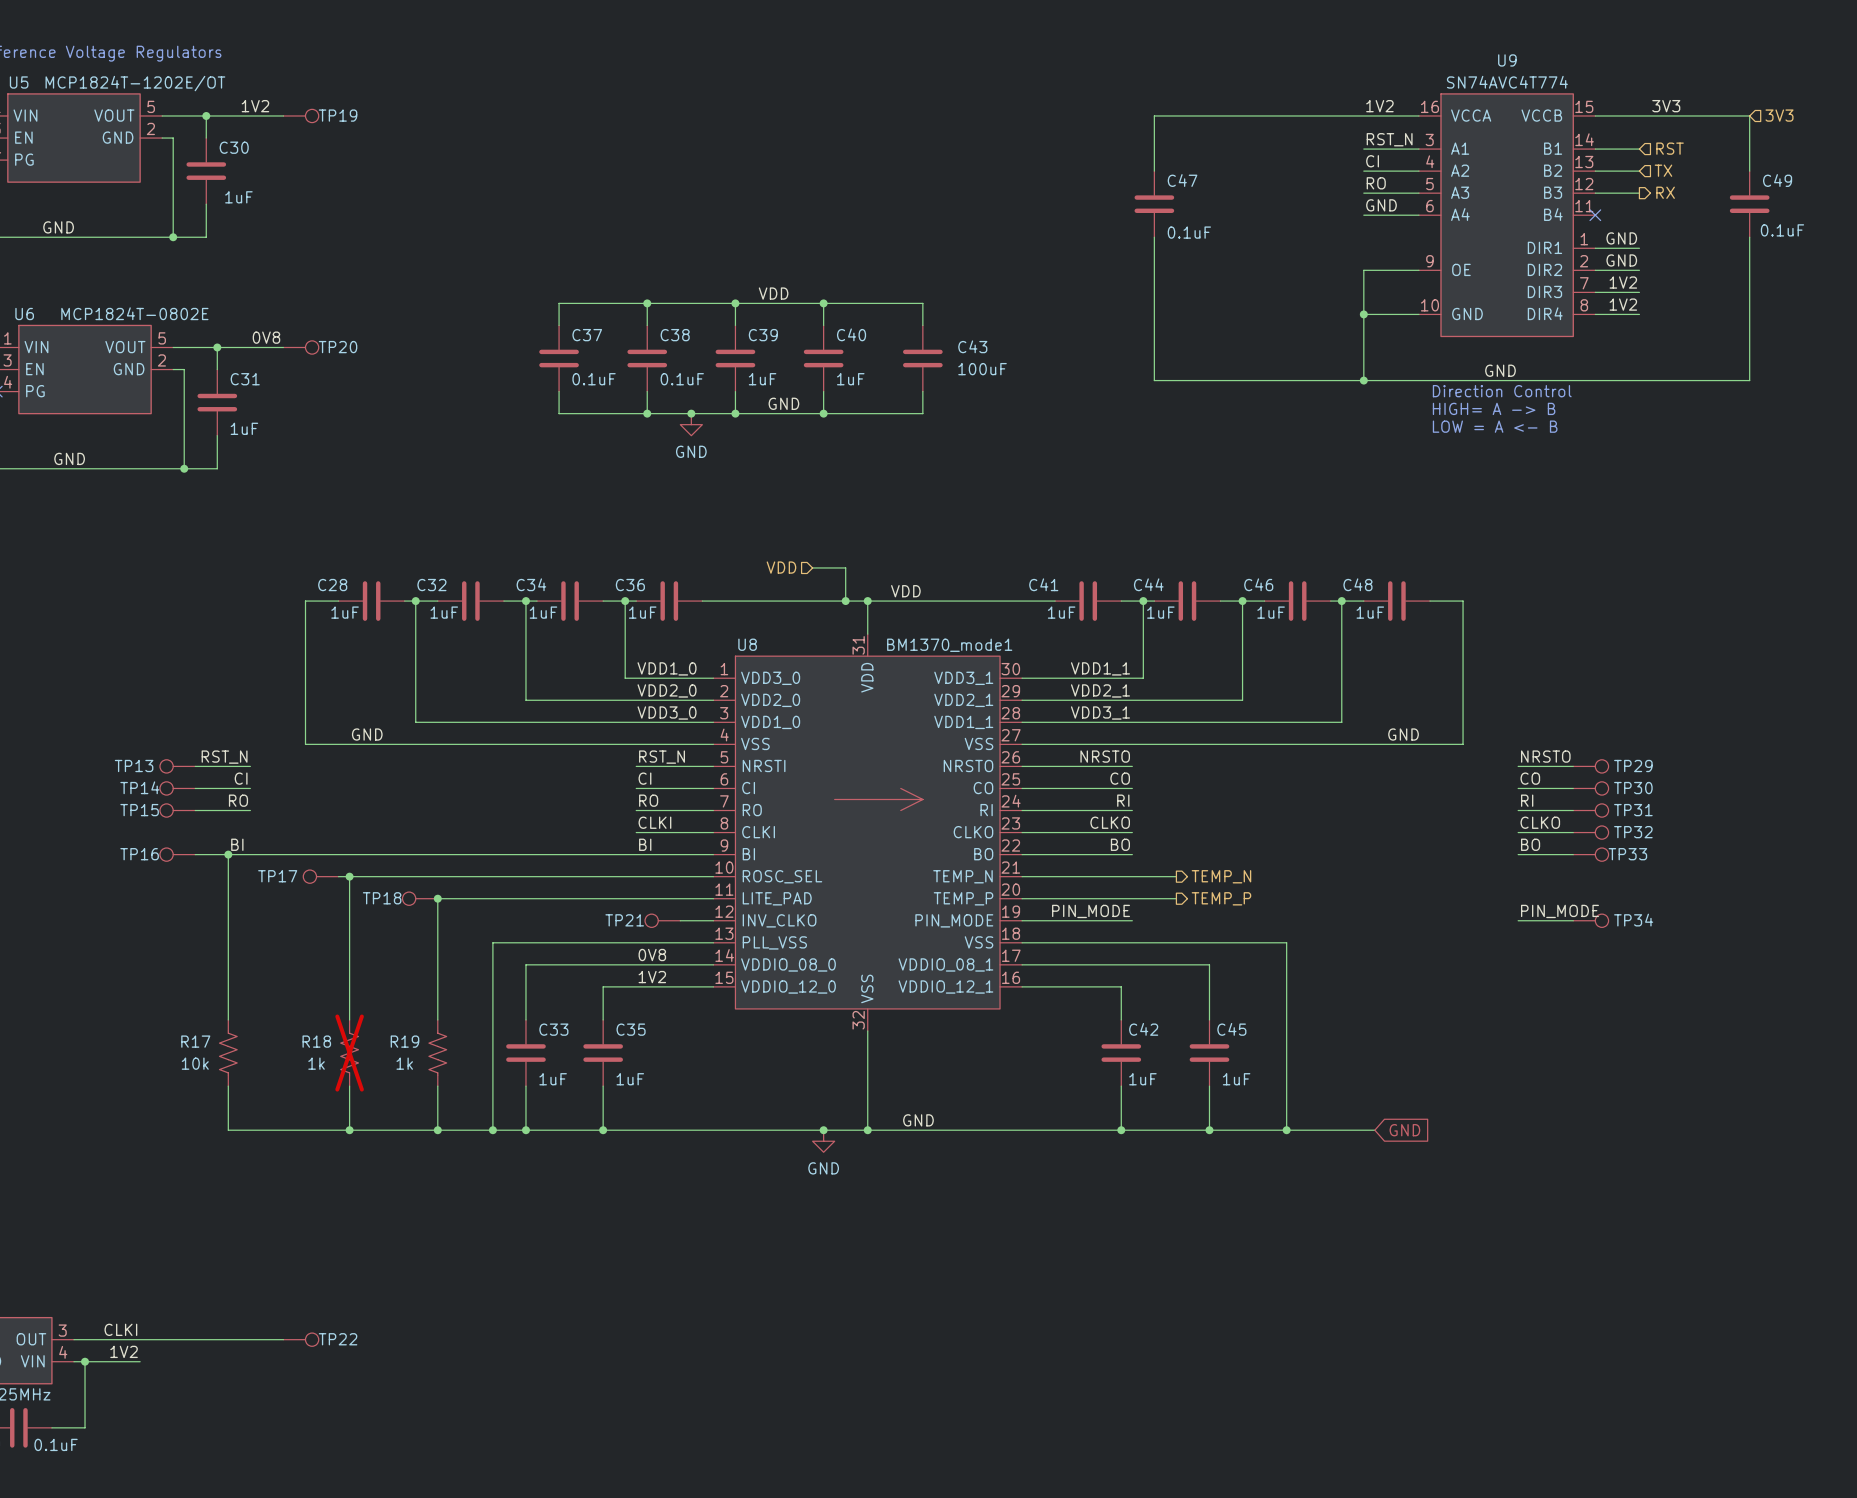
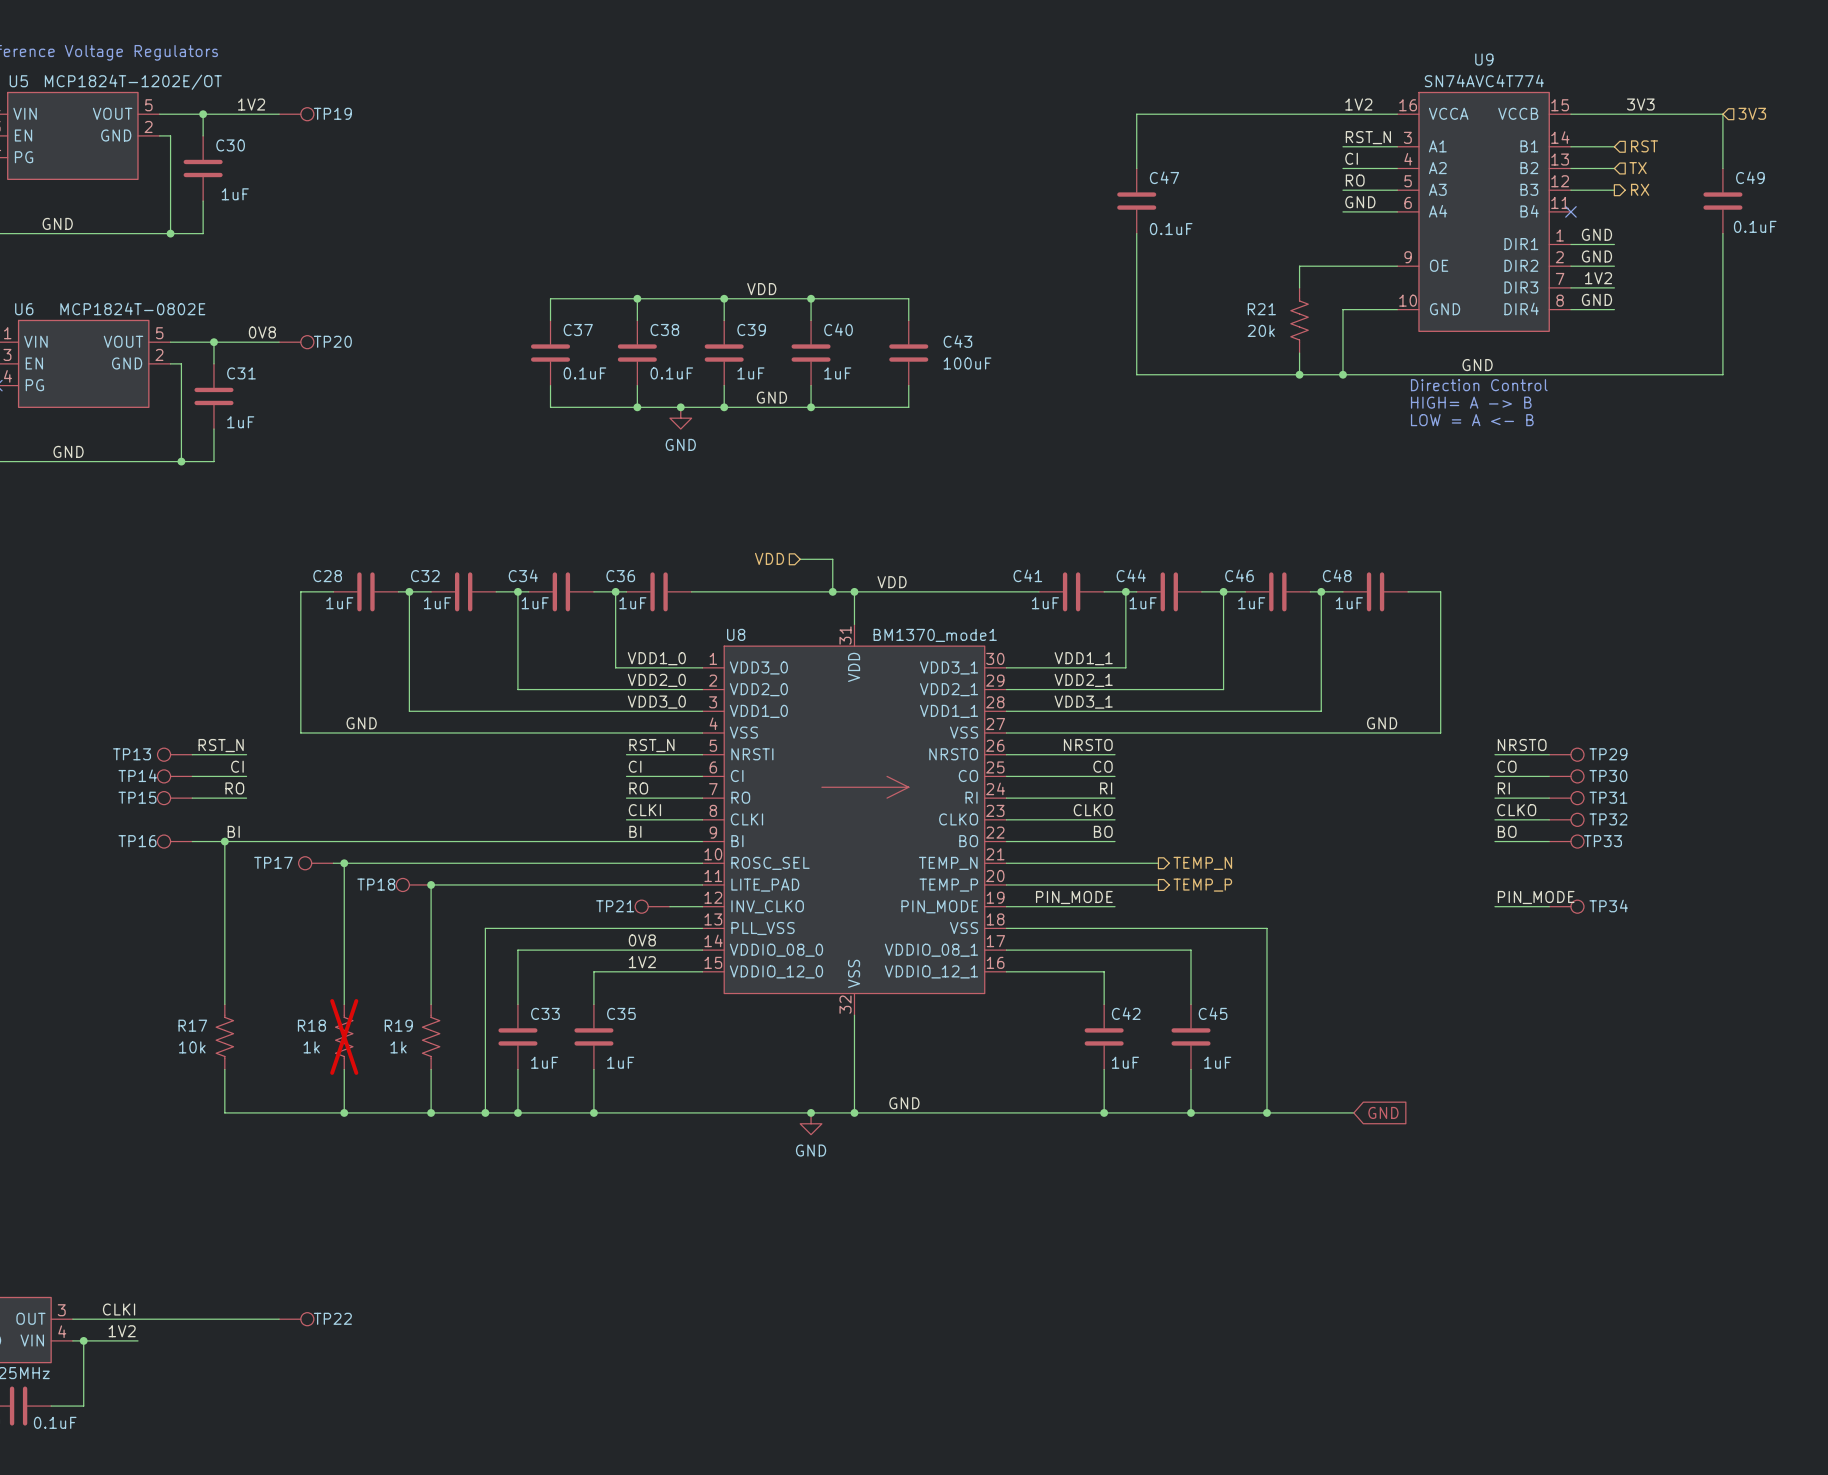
wire: (1363, 270) (1363, 314) -> (1342, 266) (1299, 266) (1299, 287)
label: 1V2 (1623, 304) -> GND (1596, 299)
junction: (1363, 314) -> none
R21: none -> 20k (1299, 320)
wire: none -> (1299, 353) (1299, 374)
junction: none -> (1299, 374)

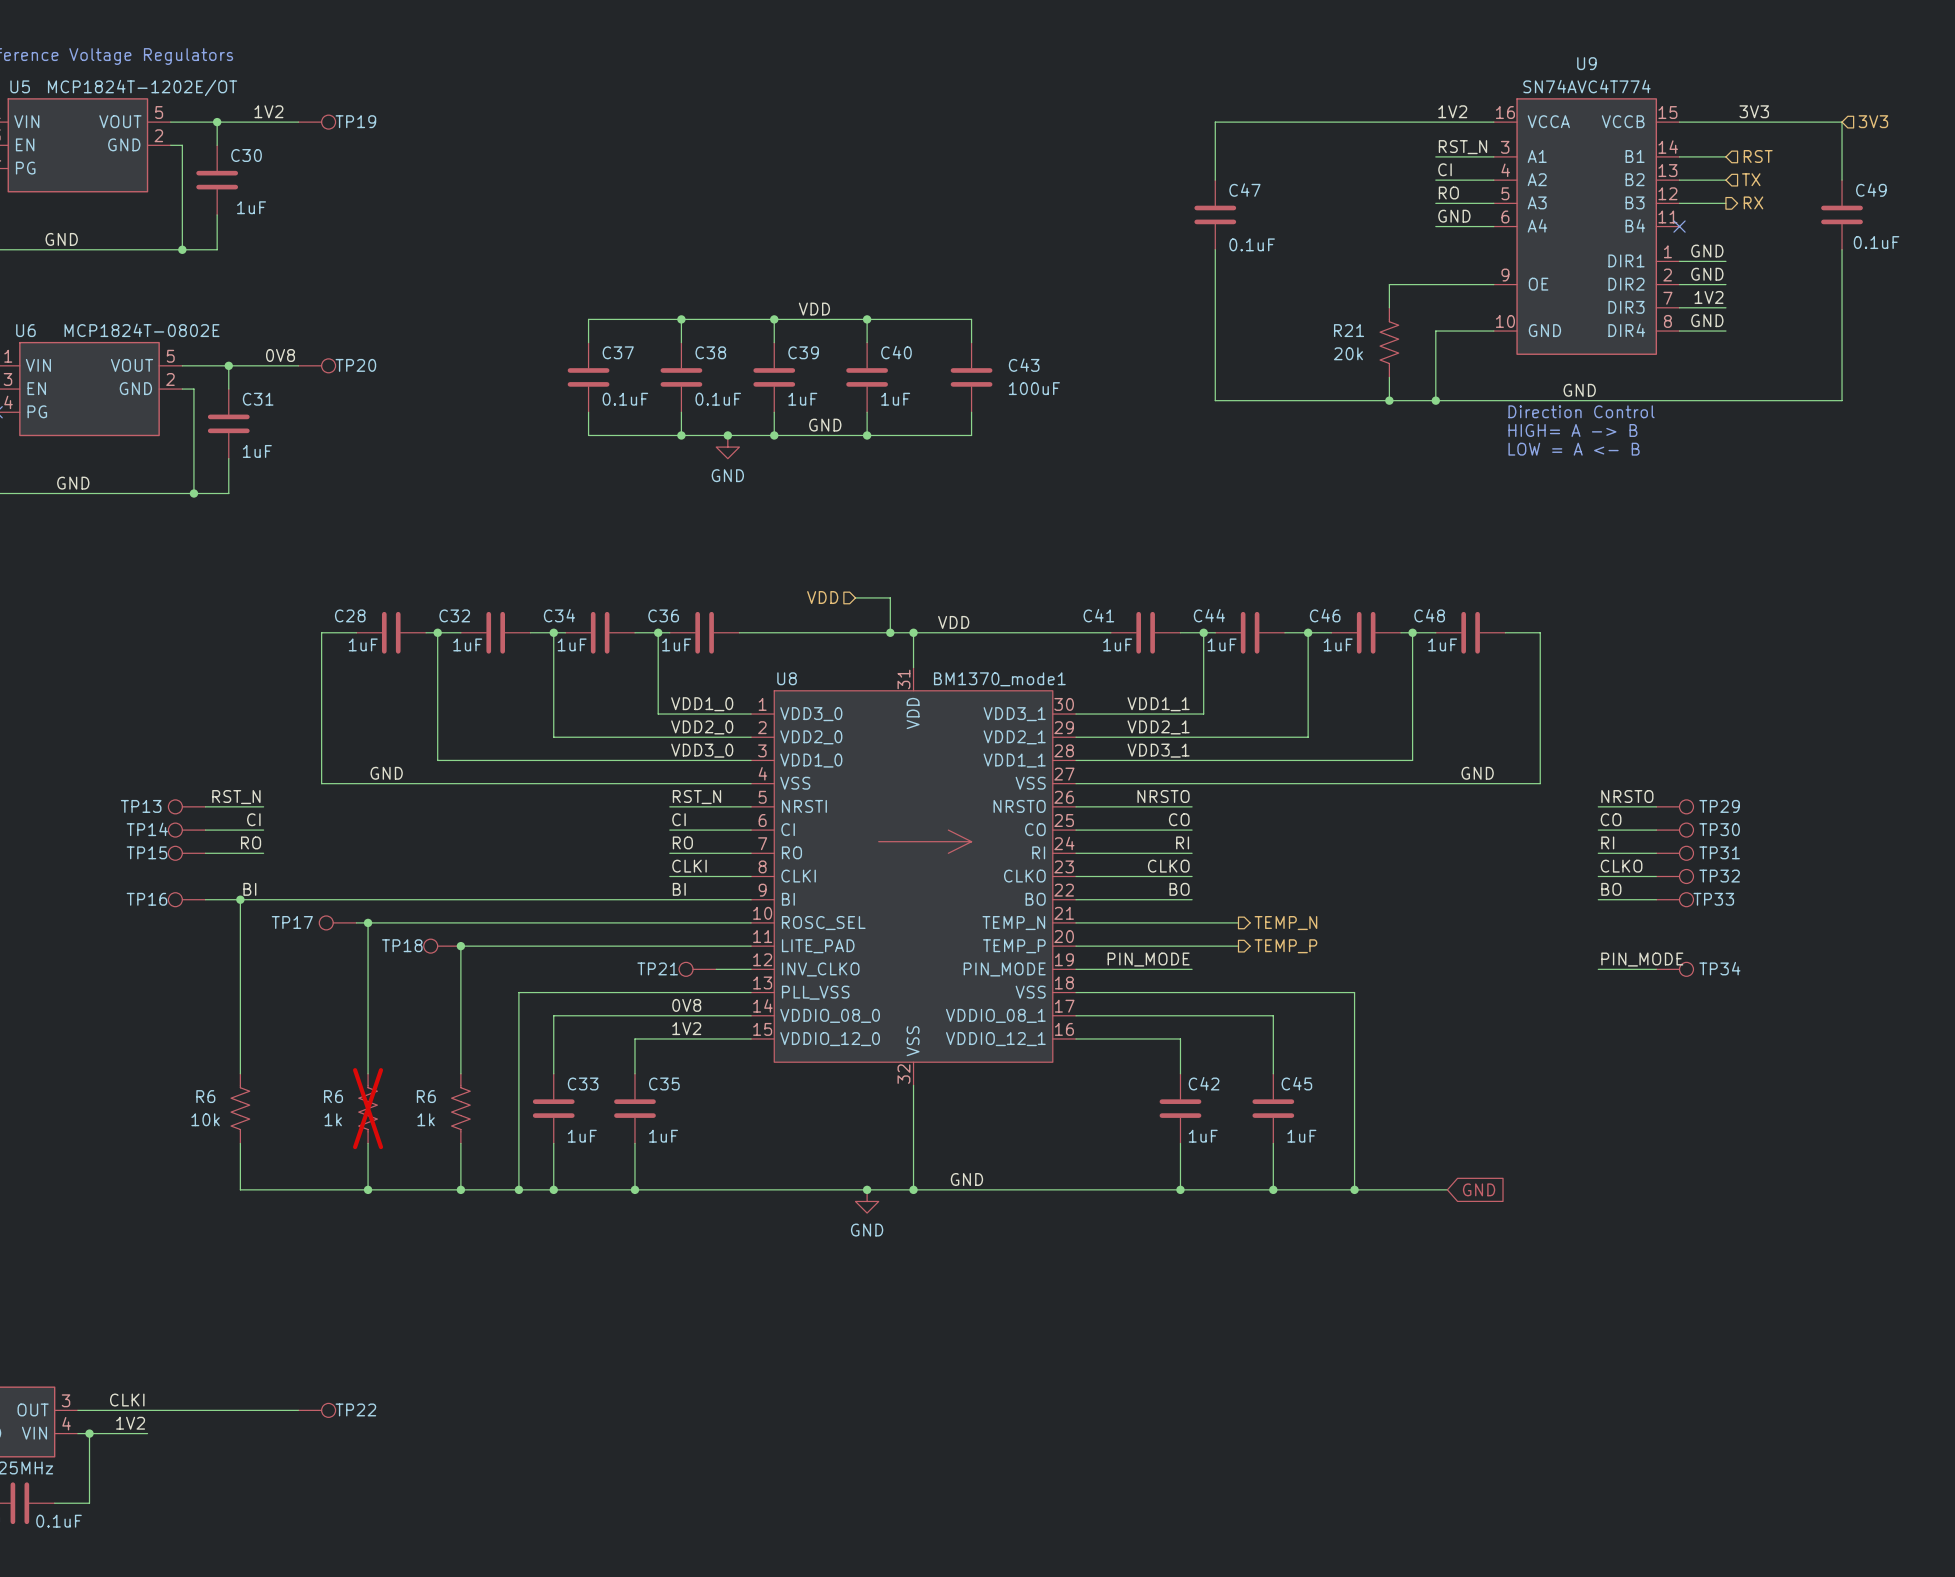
R17 name: R17 (192, 1025) -> R6 (205, 1096)
R18 name: R18 (311, 1025) -> R6 (333, 1096)
R19 name: R19 (398, 1025) -> R6 (426, 1096)

